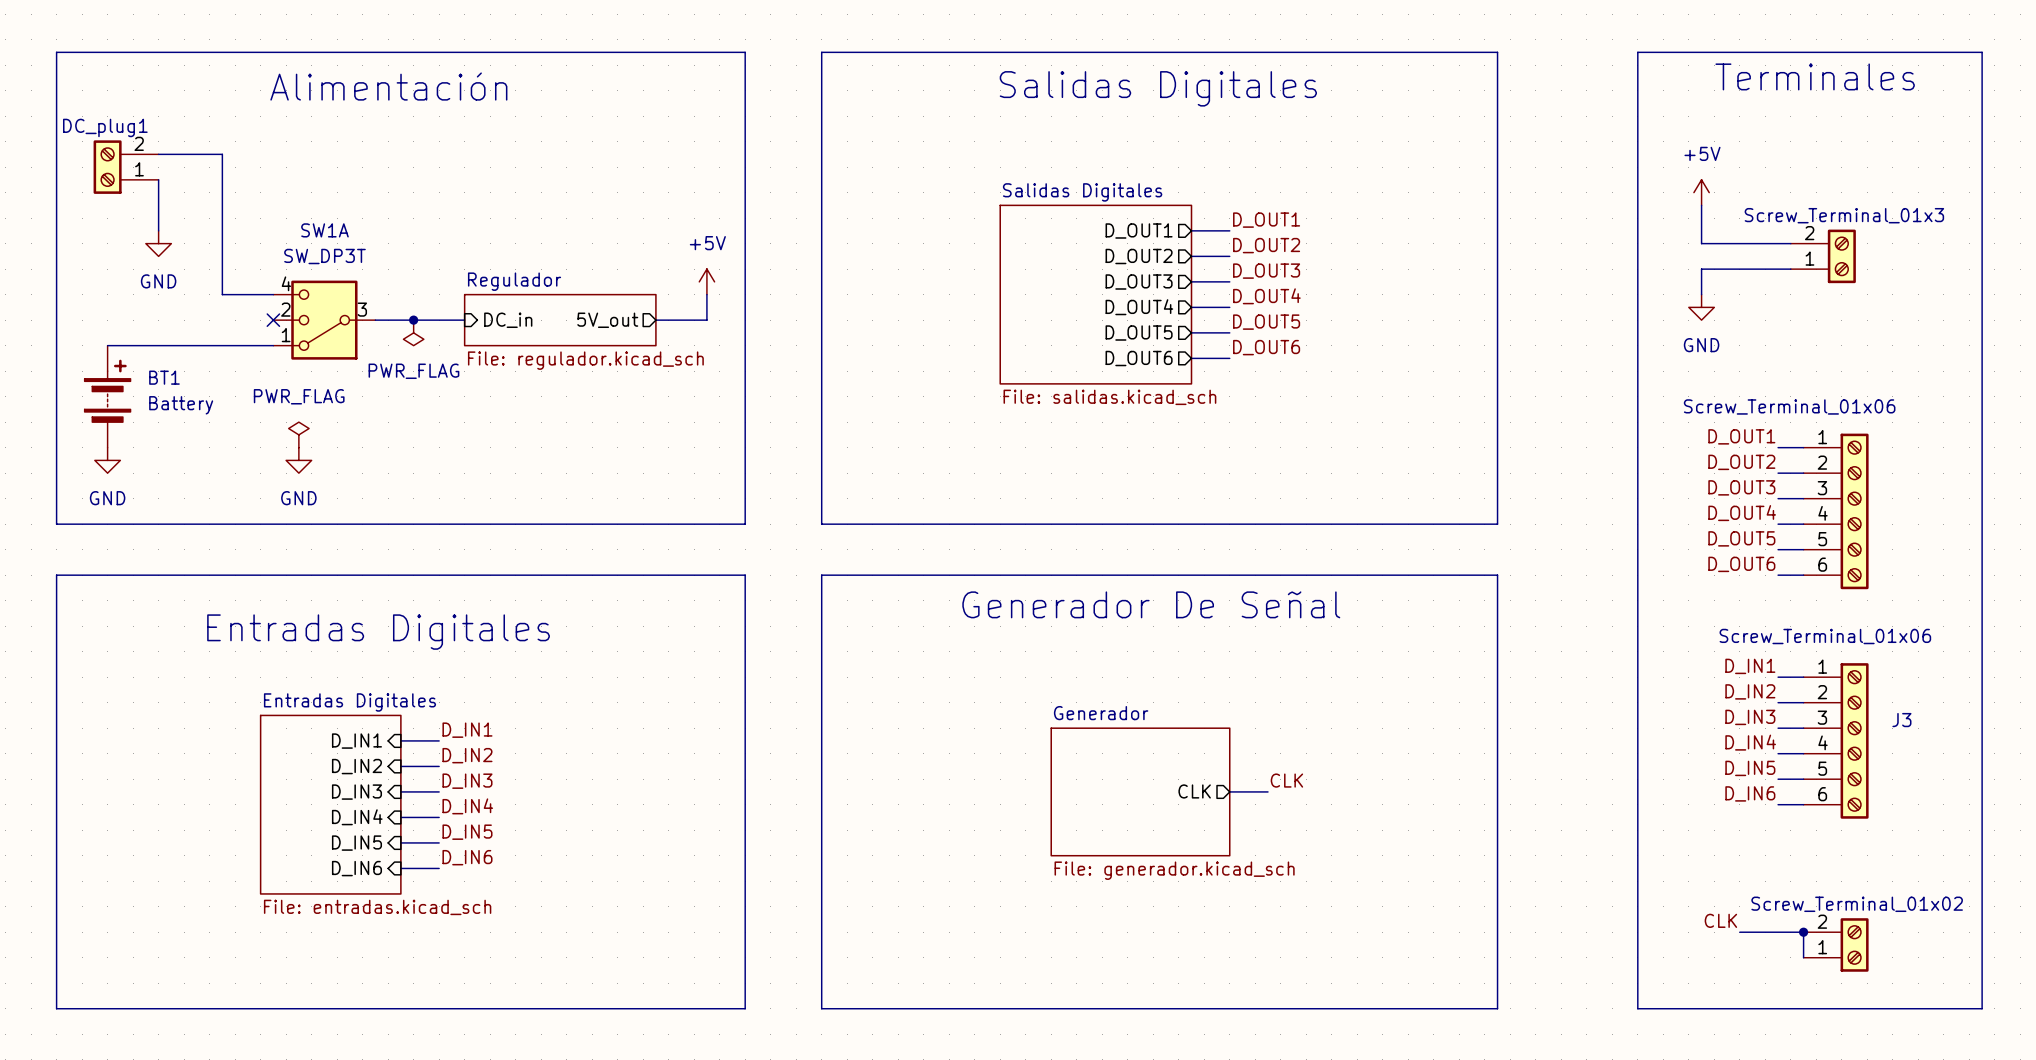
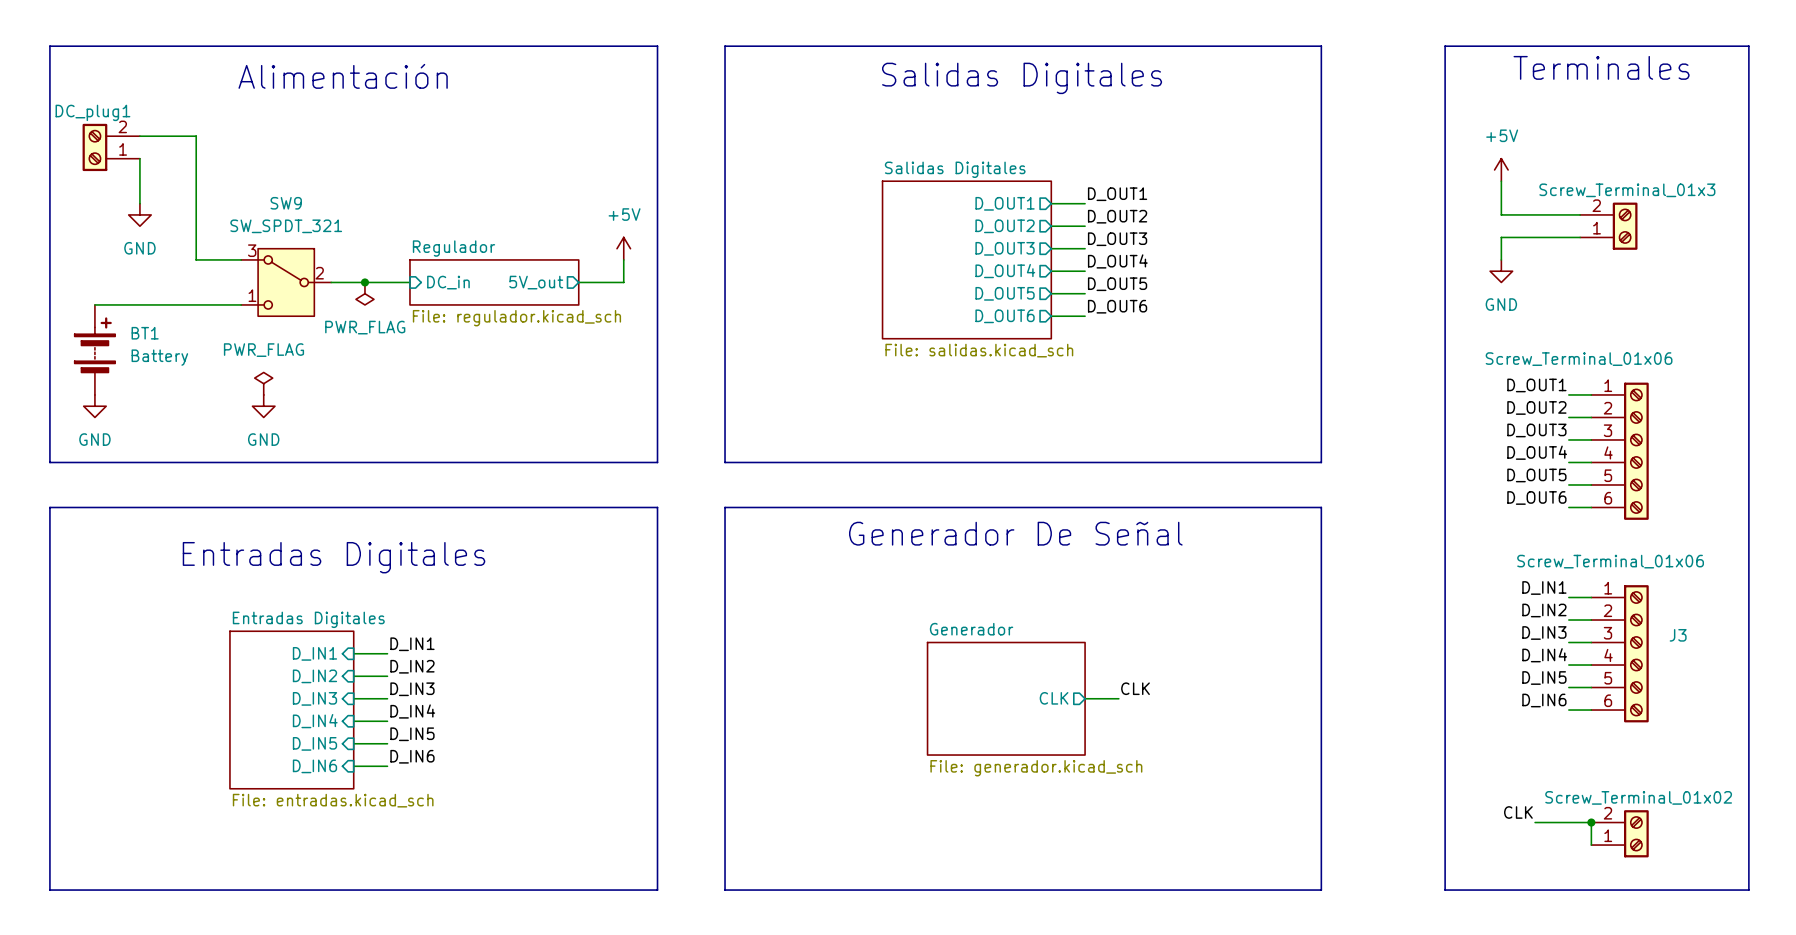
no-connect mark: (273, 320) -> none
SW1A: SW_DP3T (324, 320) -> none
SW9: none -> SW_SPDT_321 (286, 282)

